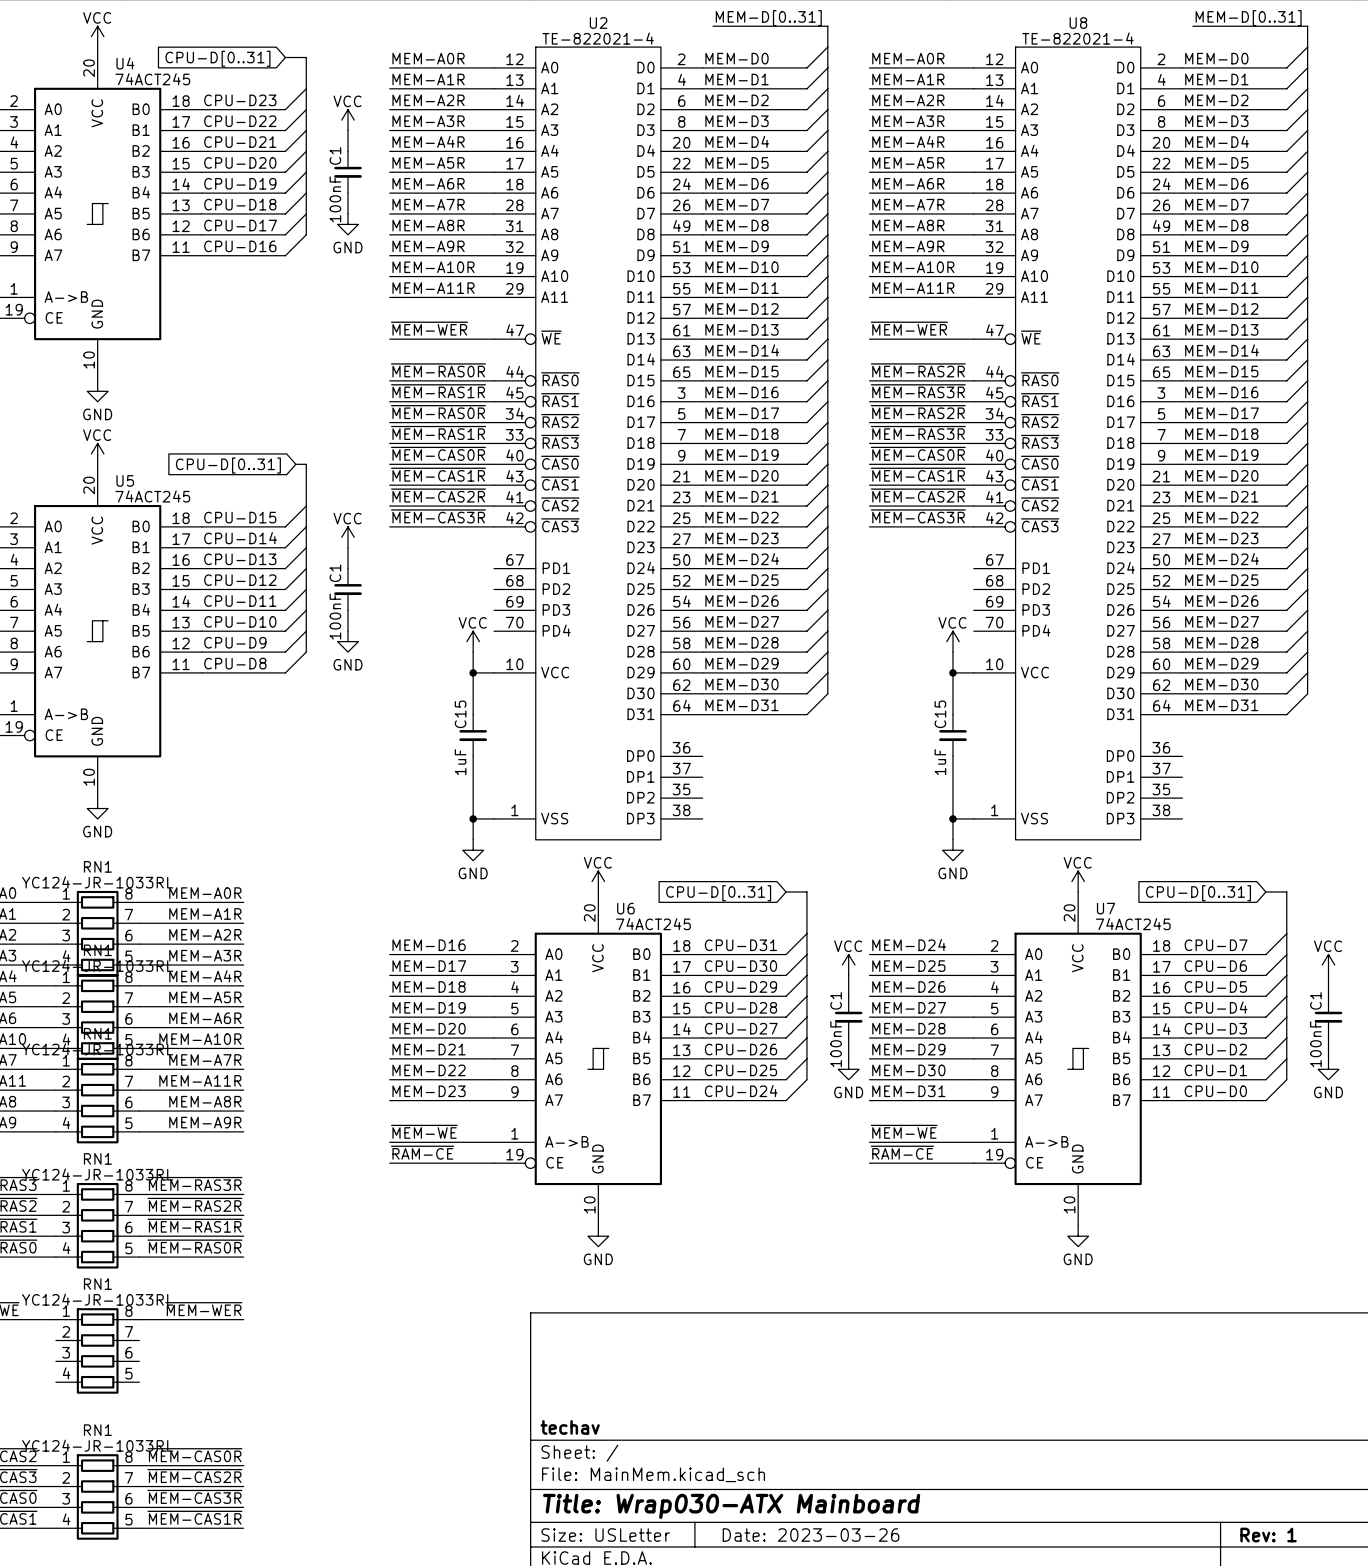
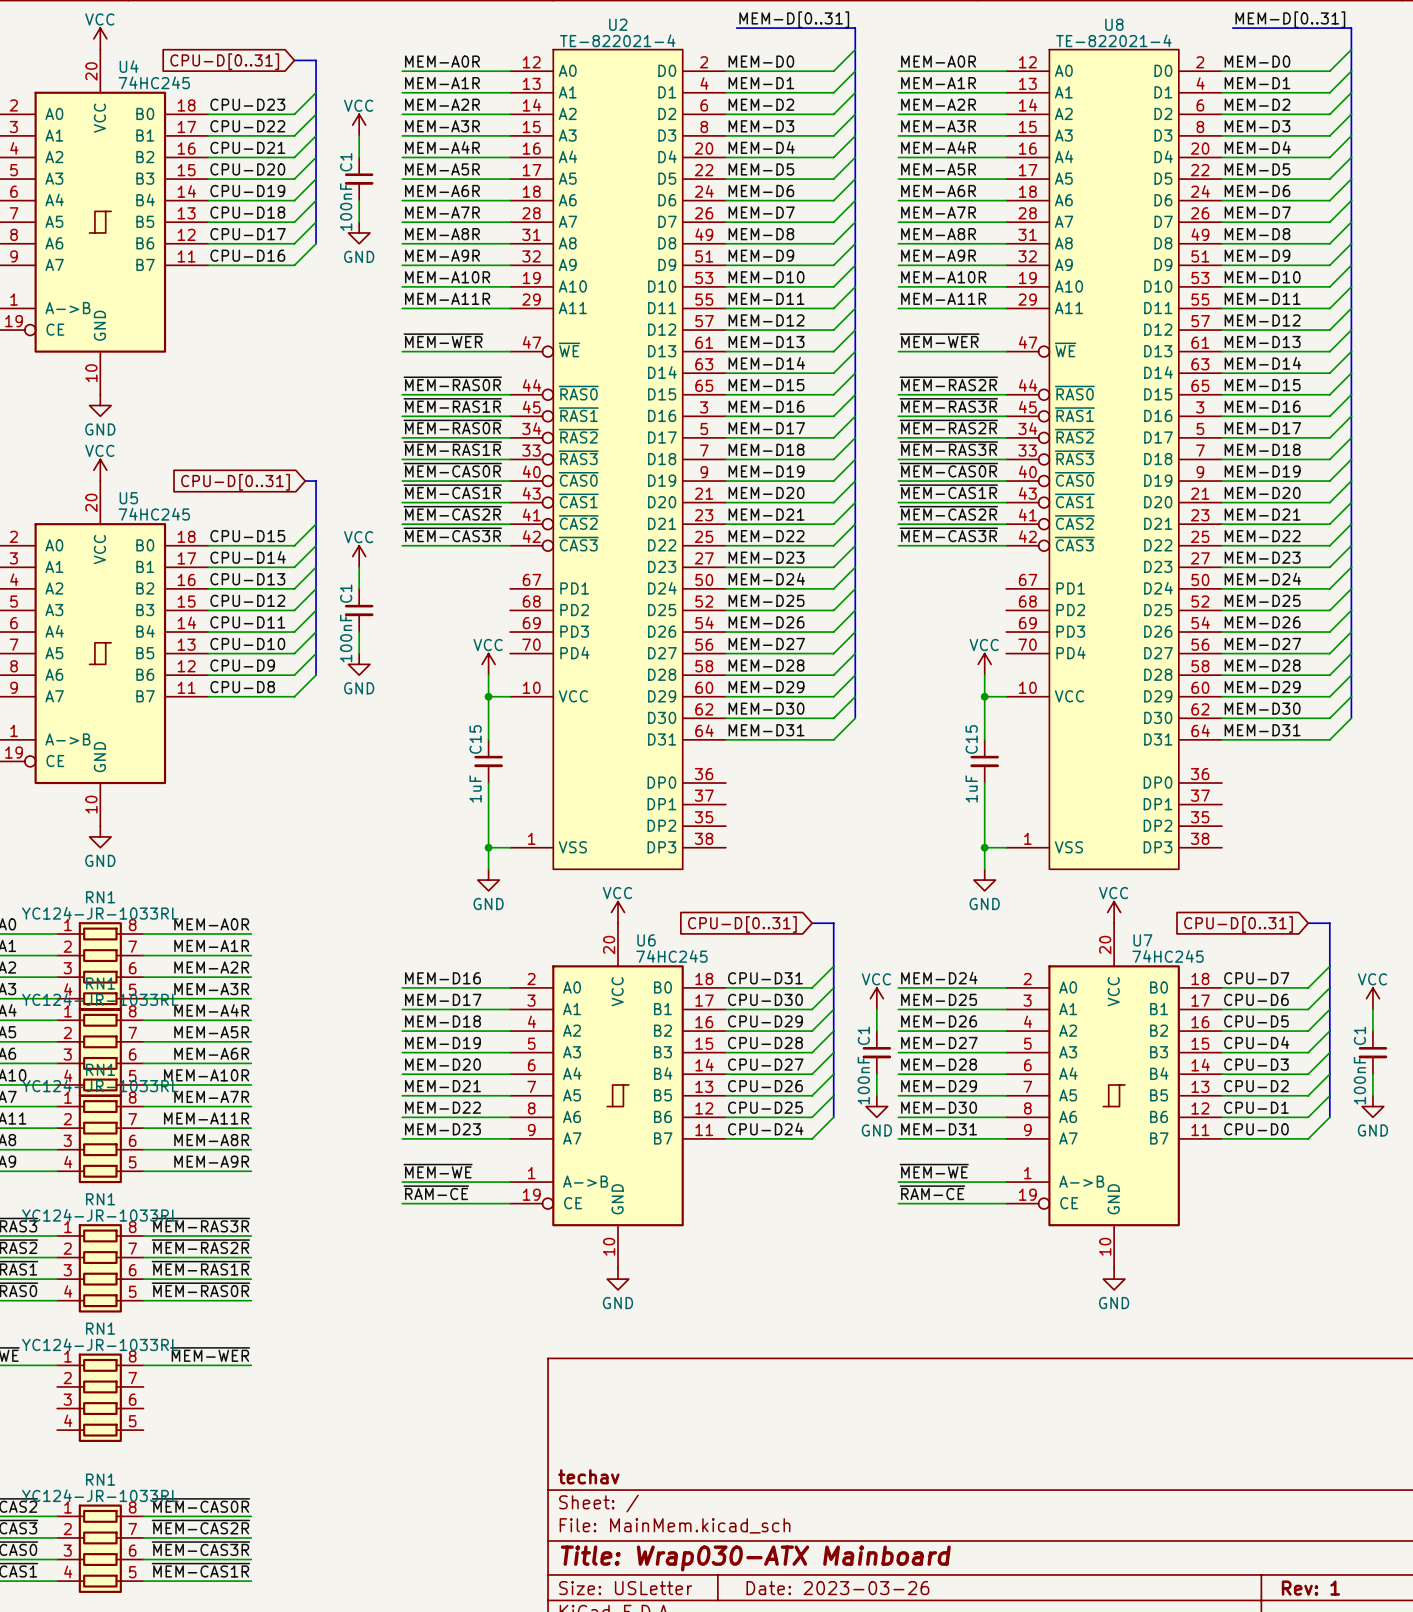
U4 value: 74ACT245 (152, 79) -> 74HC245 (154, 82)
U5 value: 74ACT245 (152, 496) -> 74HC245 (154, 514)
U6 value: 74ACT245 (653, 924) -> 74HC245 (671, 956)
U7 value: 74ACT245 (1133, 924) -> 74HC245 (1168, 956)

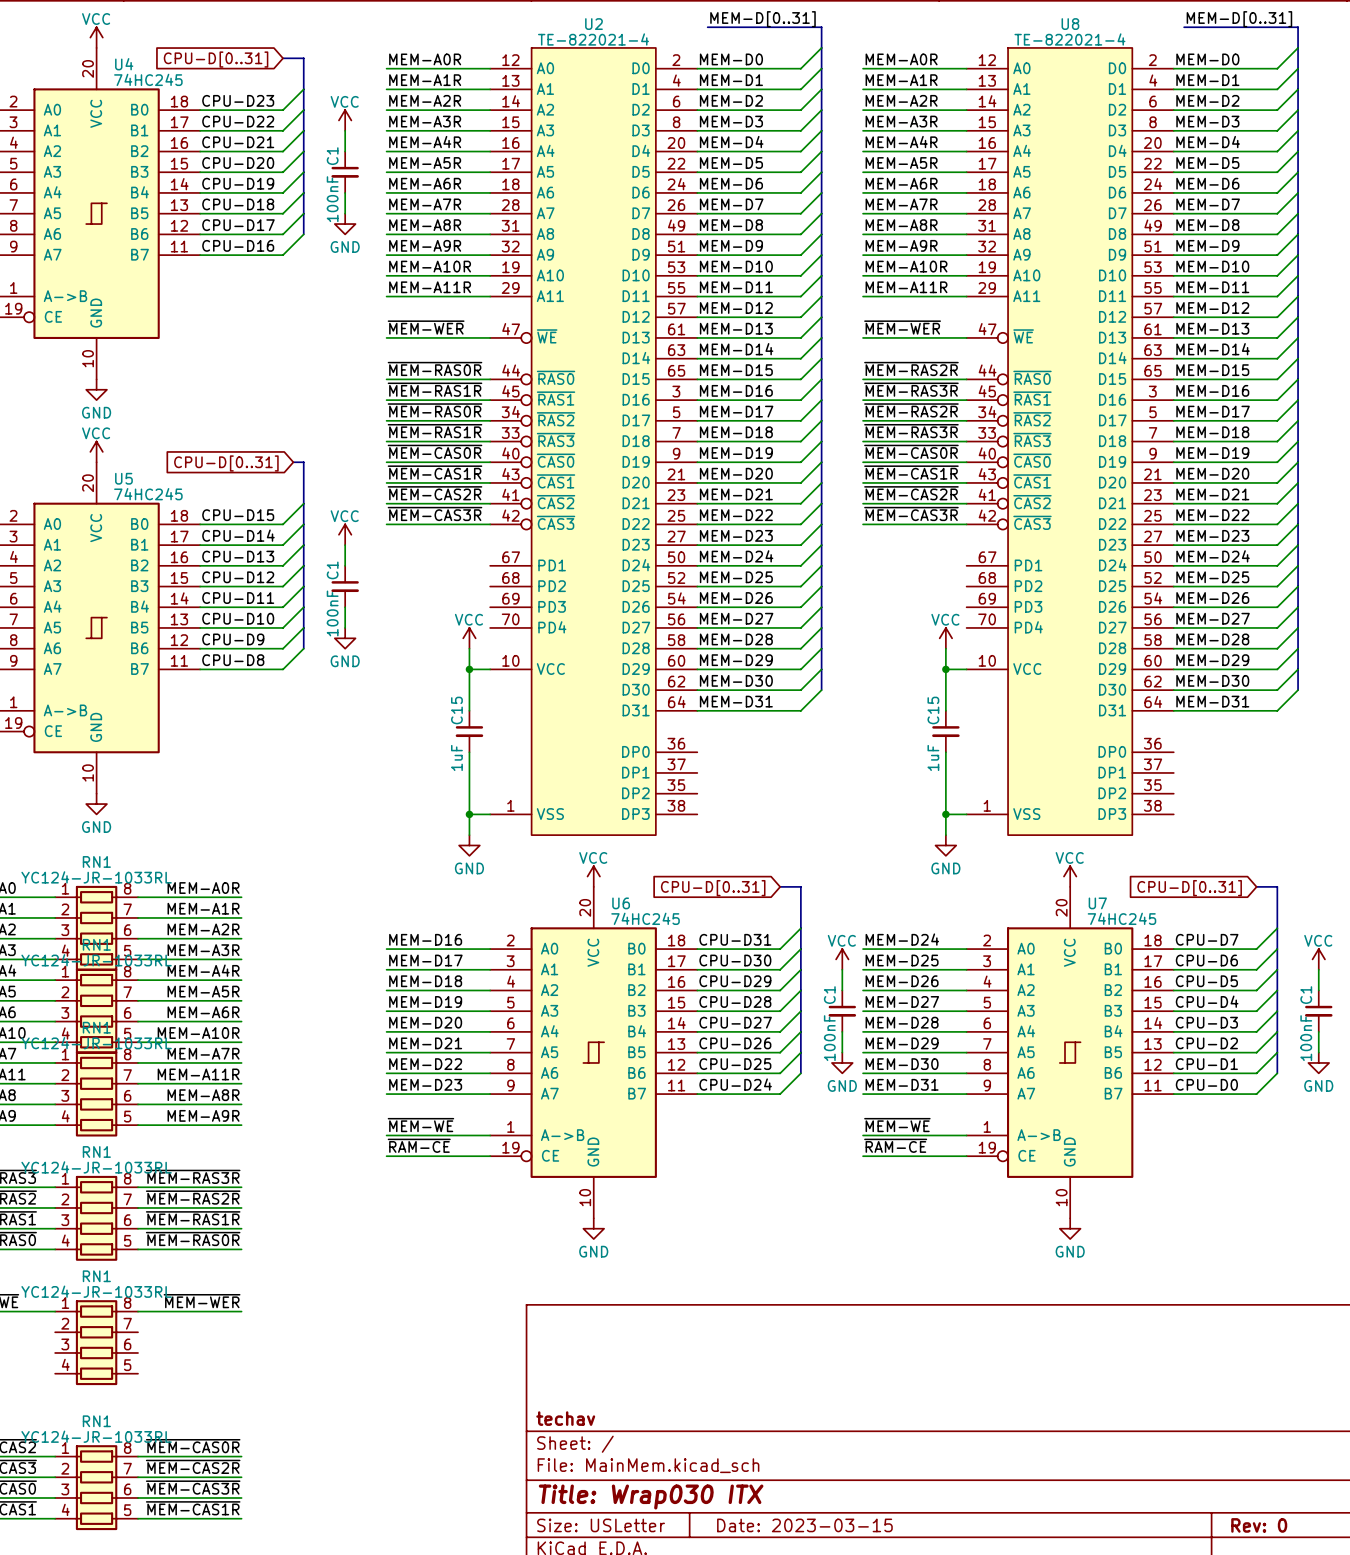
title block: Title: Wrap030-ATX Mainboard (755, 1558) -> Title: Wrap030 ITX (651, 1497)
title block: Date: 2023-03-26 (837, 1588) -> Date: 2023-03-15 (804, 1525)
title block: Rev: 1 (1310, 1588) -> Rev: 0 (1259, 1525)

